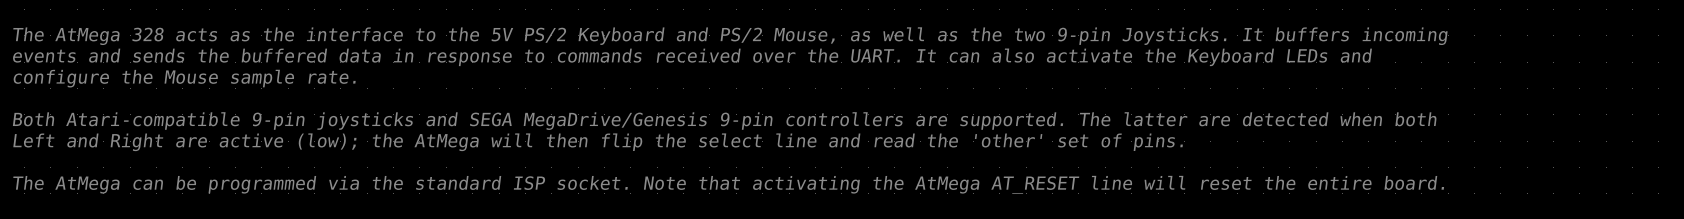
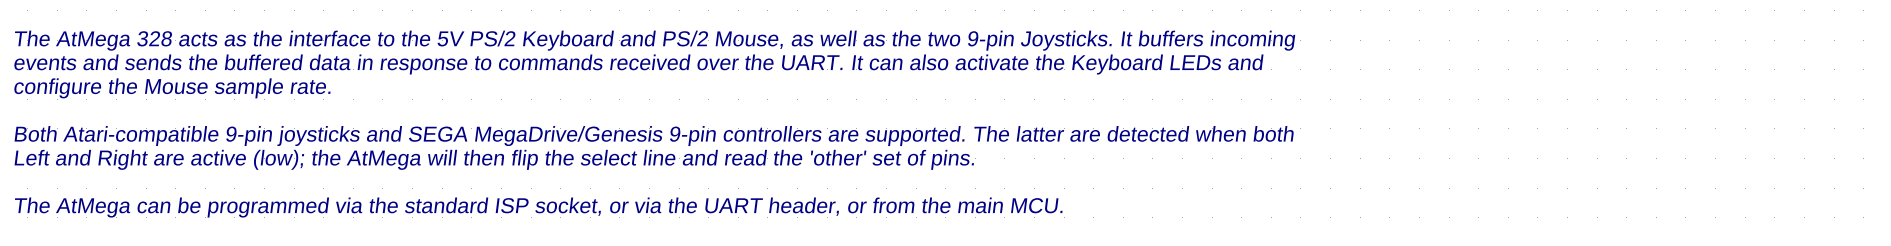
text: The AtMega can be programmed via the standard ISP socket. Note that activating the AtMega AT_RESET line will reset the entire board. (728, 184) -> The AtMega can be programmed via the standard ISP socket, or via the UART header, or from the main MCU. (538, 207)

